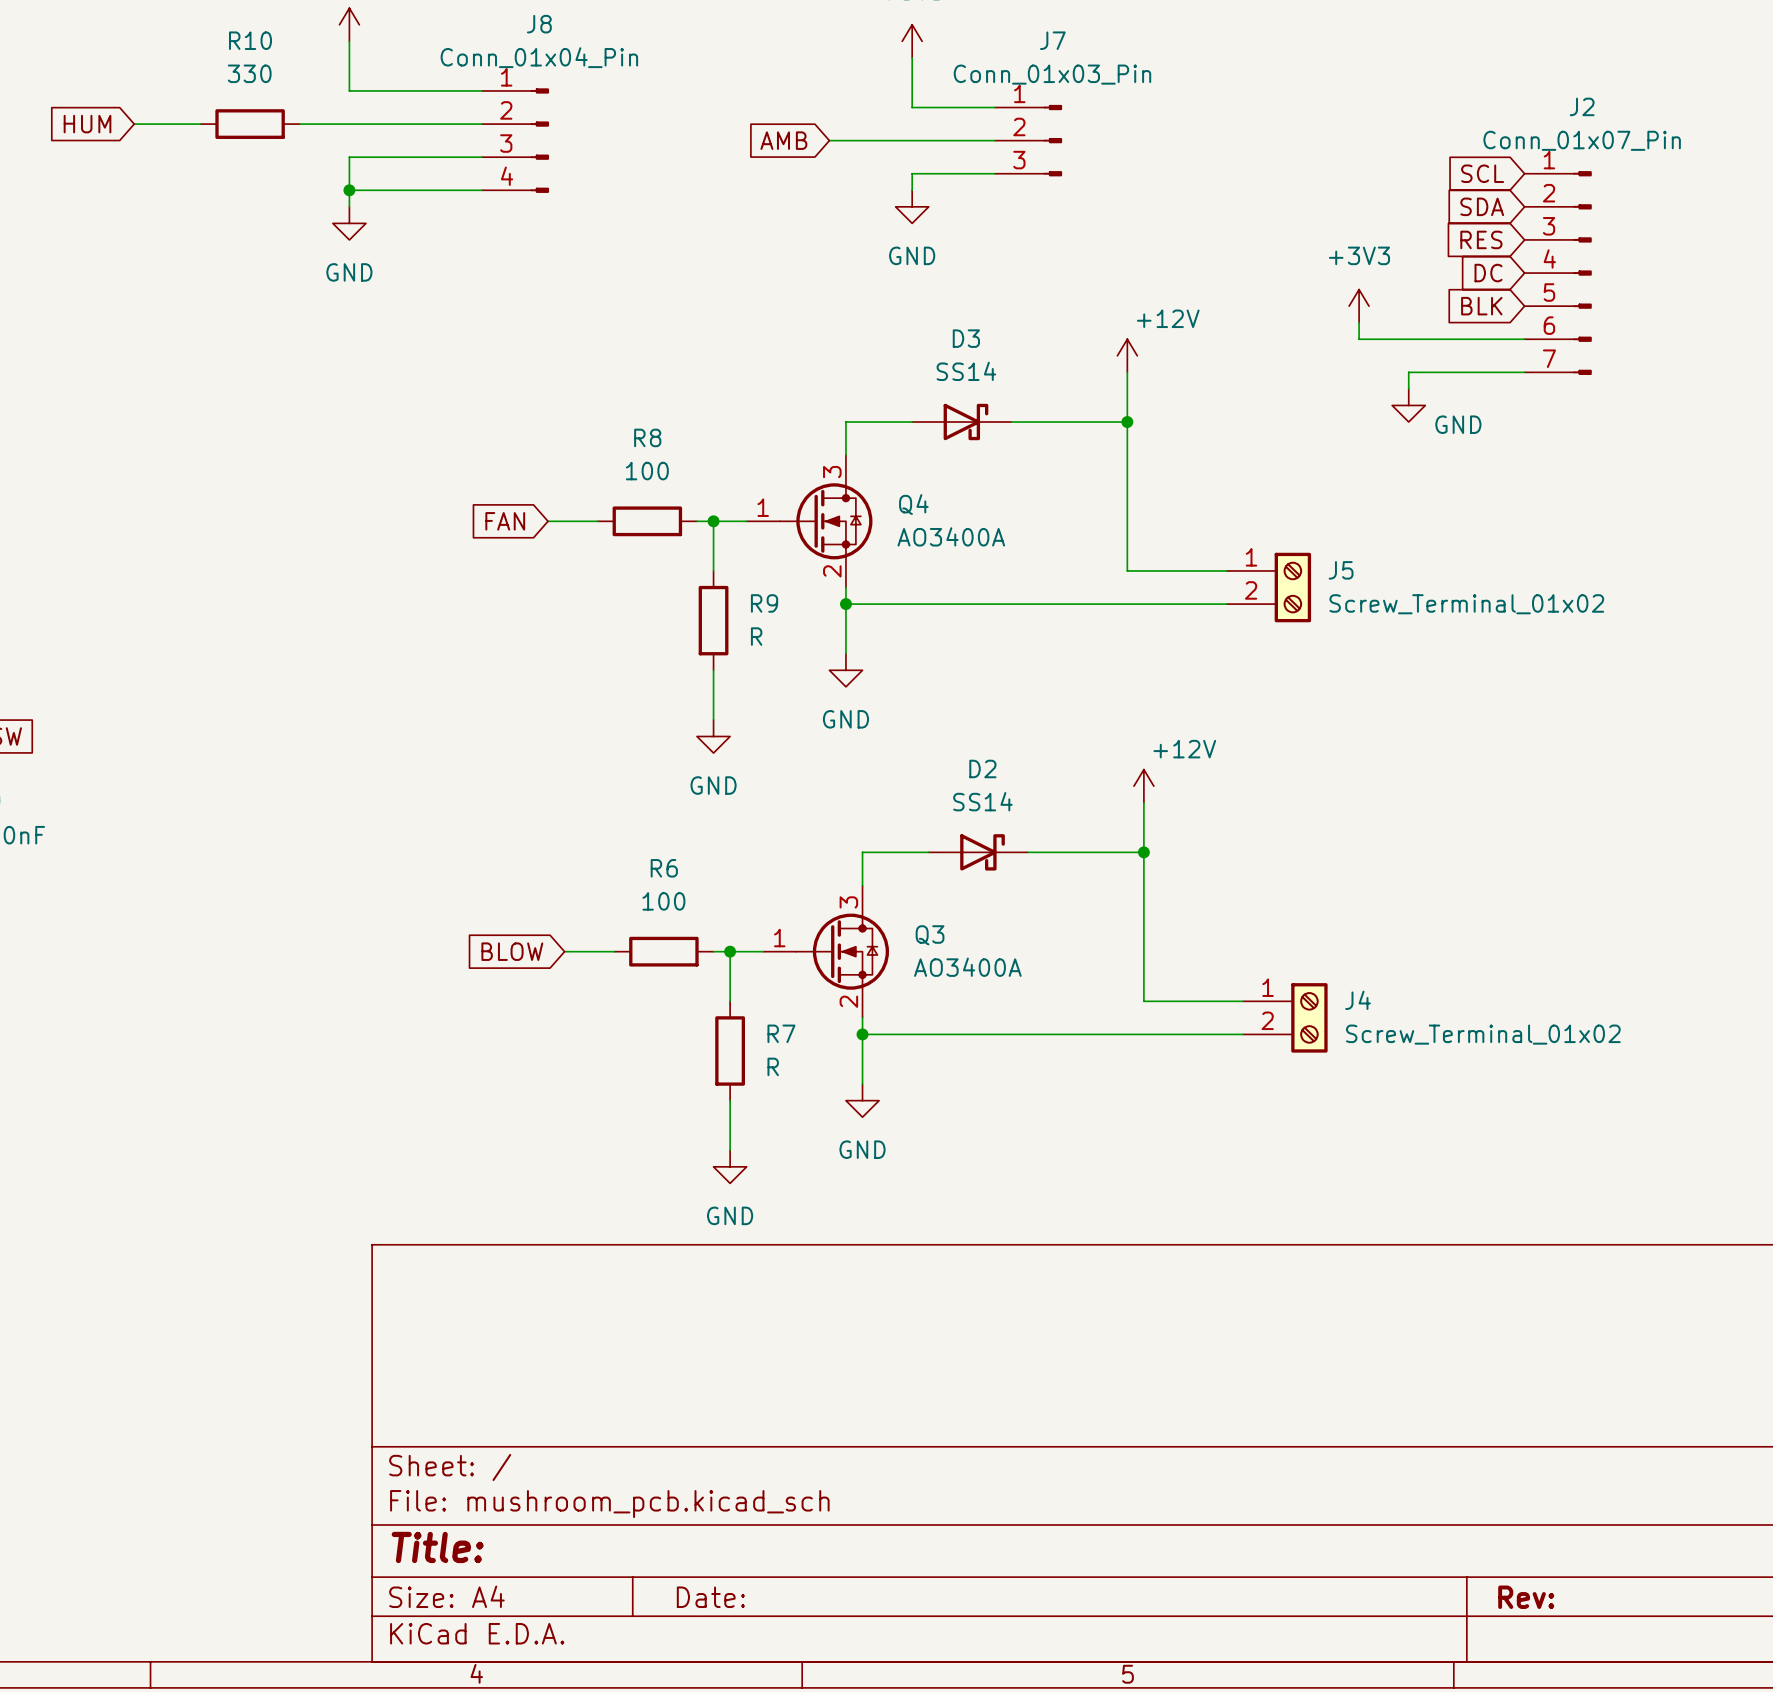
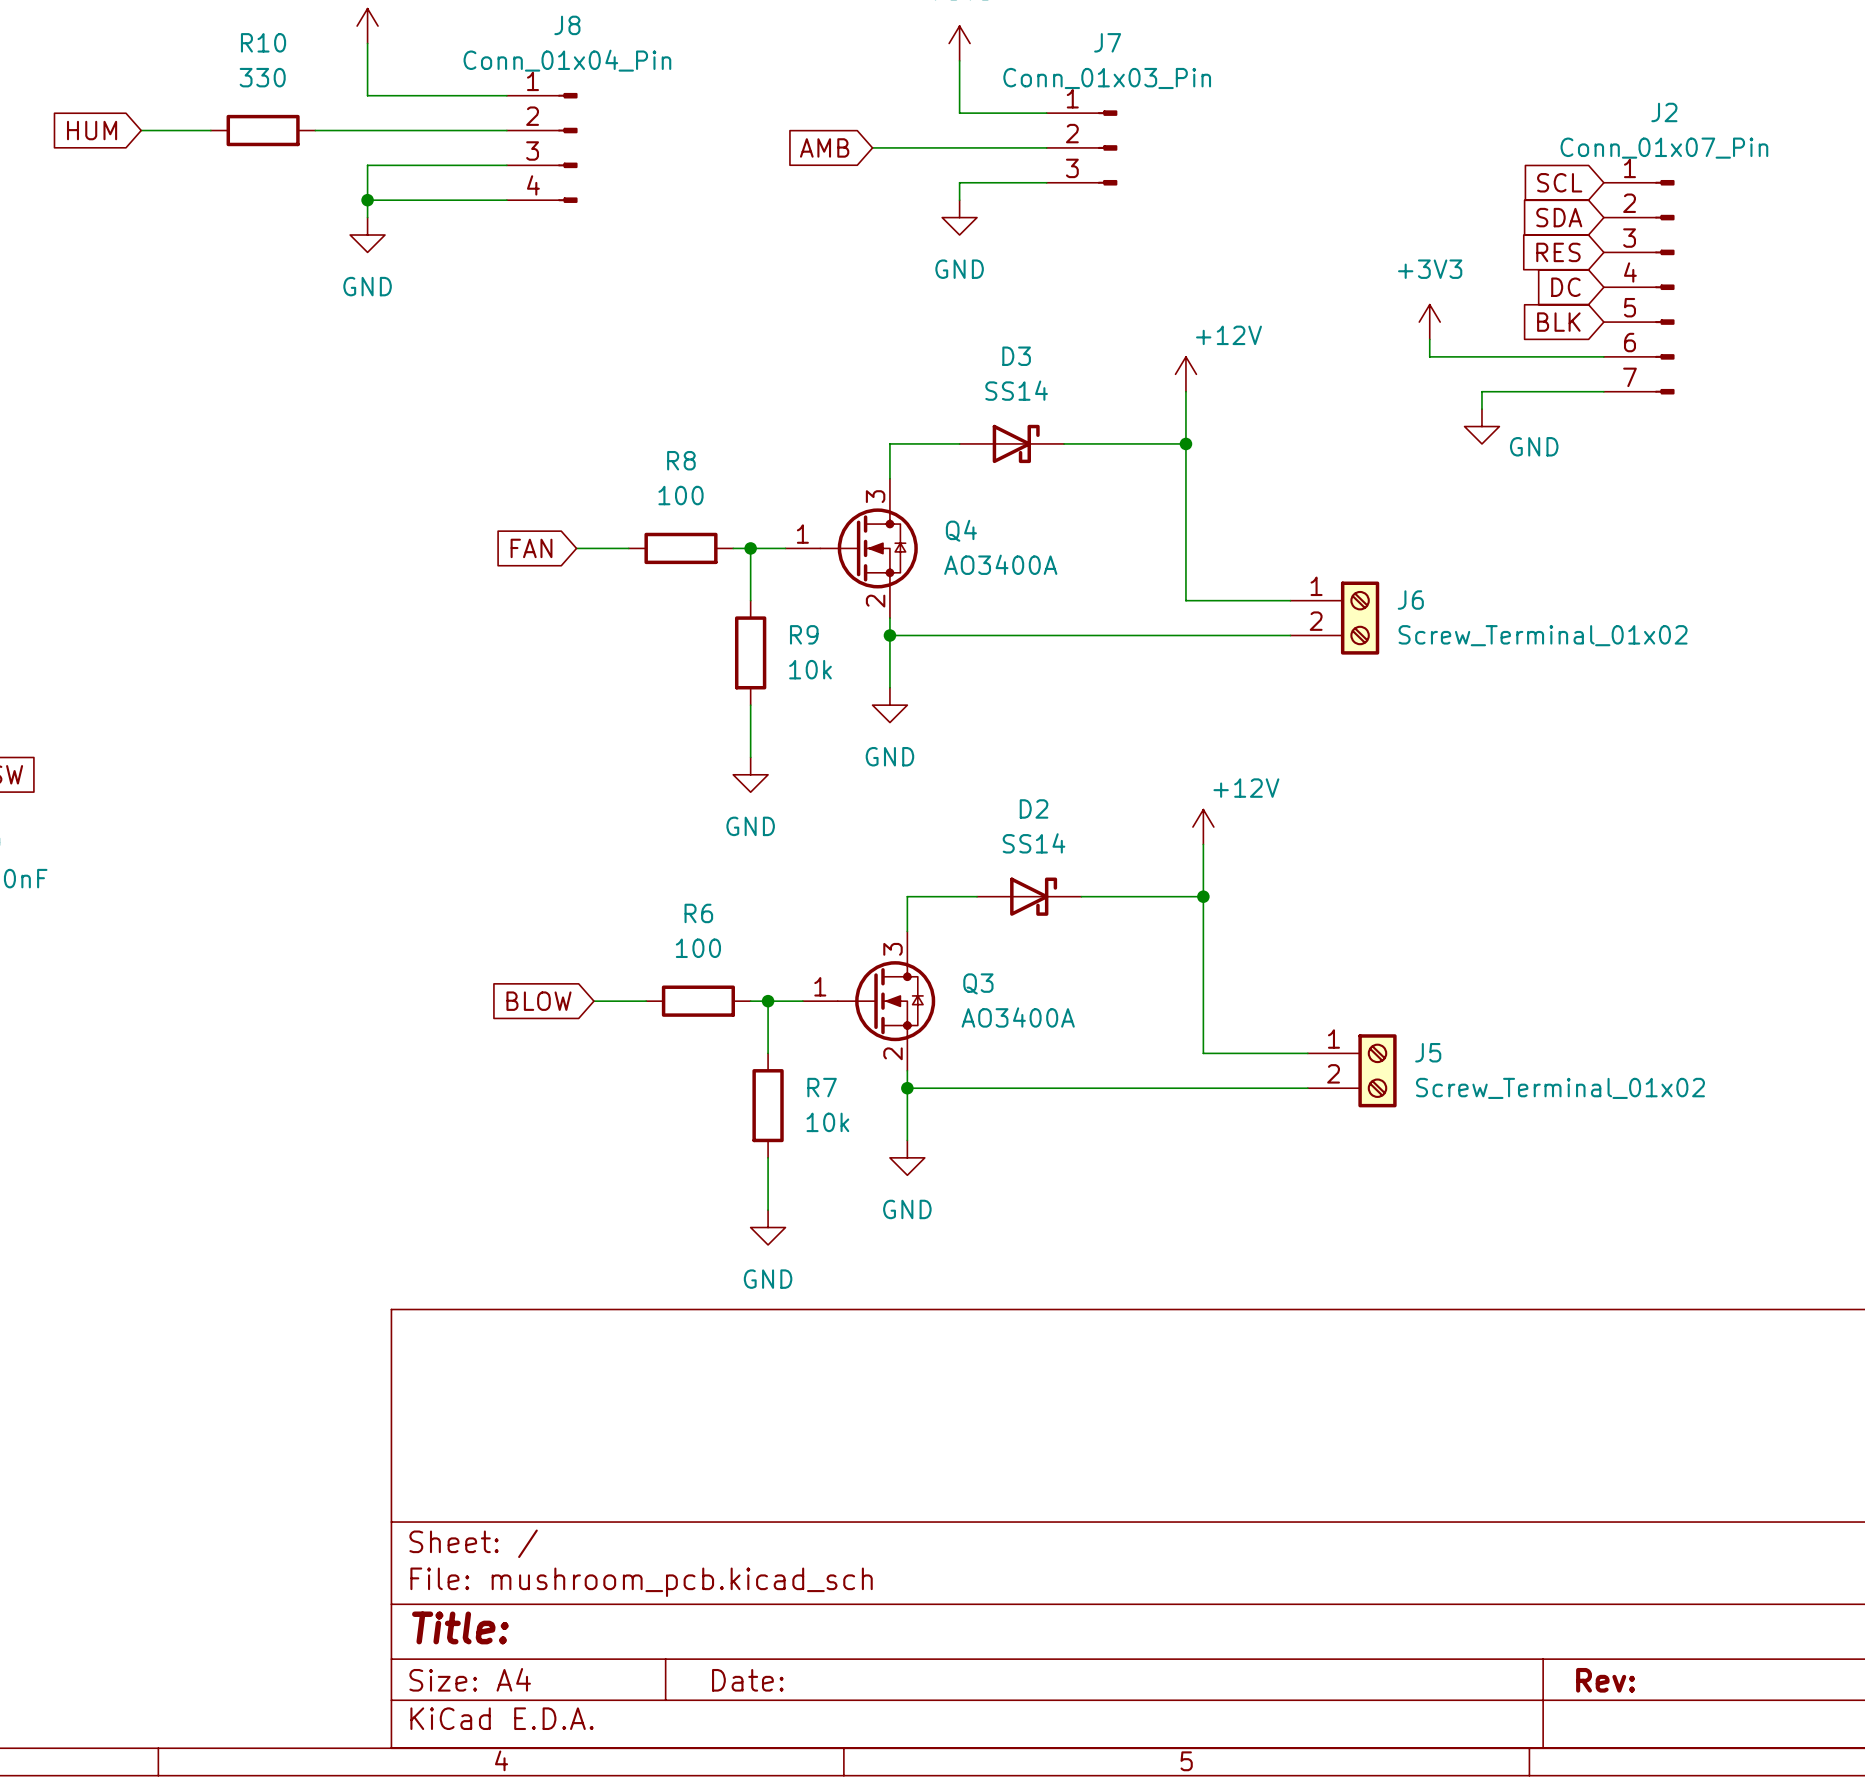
J5 name: J5 (1341, 570) -> J6 (1410, 600)
R9 value: R (756, 636) -> 10k (810, 669)
J4 name: J4 (1358, 1000) -> J5 (1428, 1052)
R7 value: R (773, 1066) -> 10k (827, 1122)

